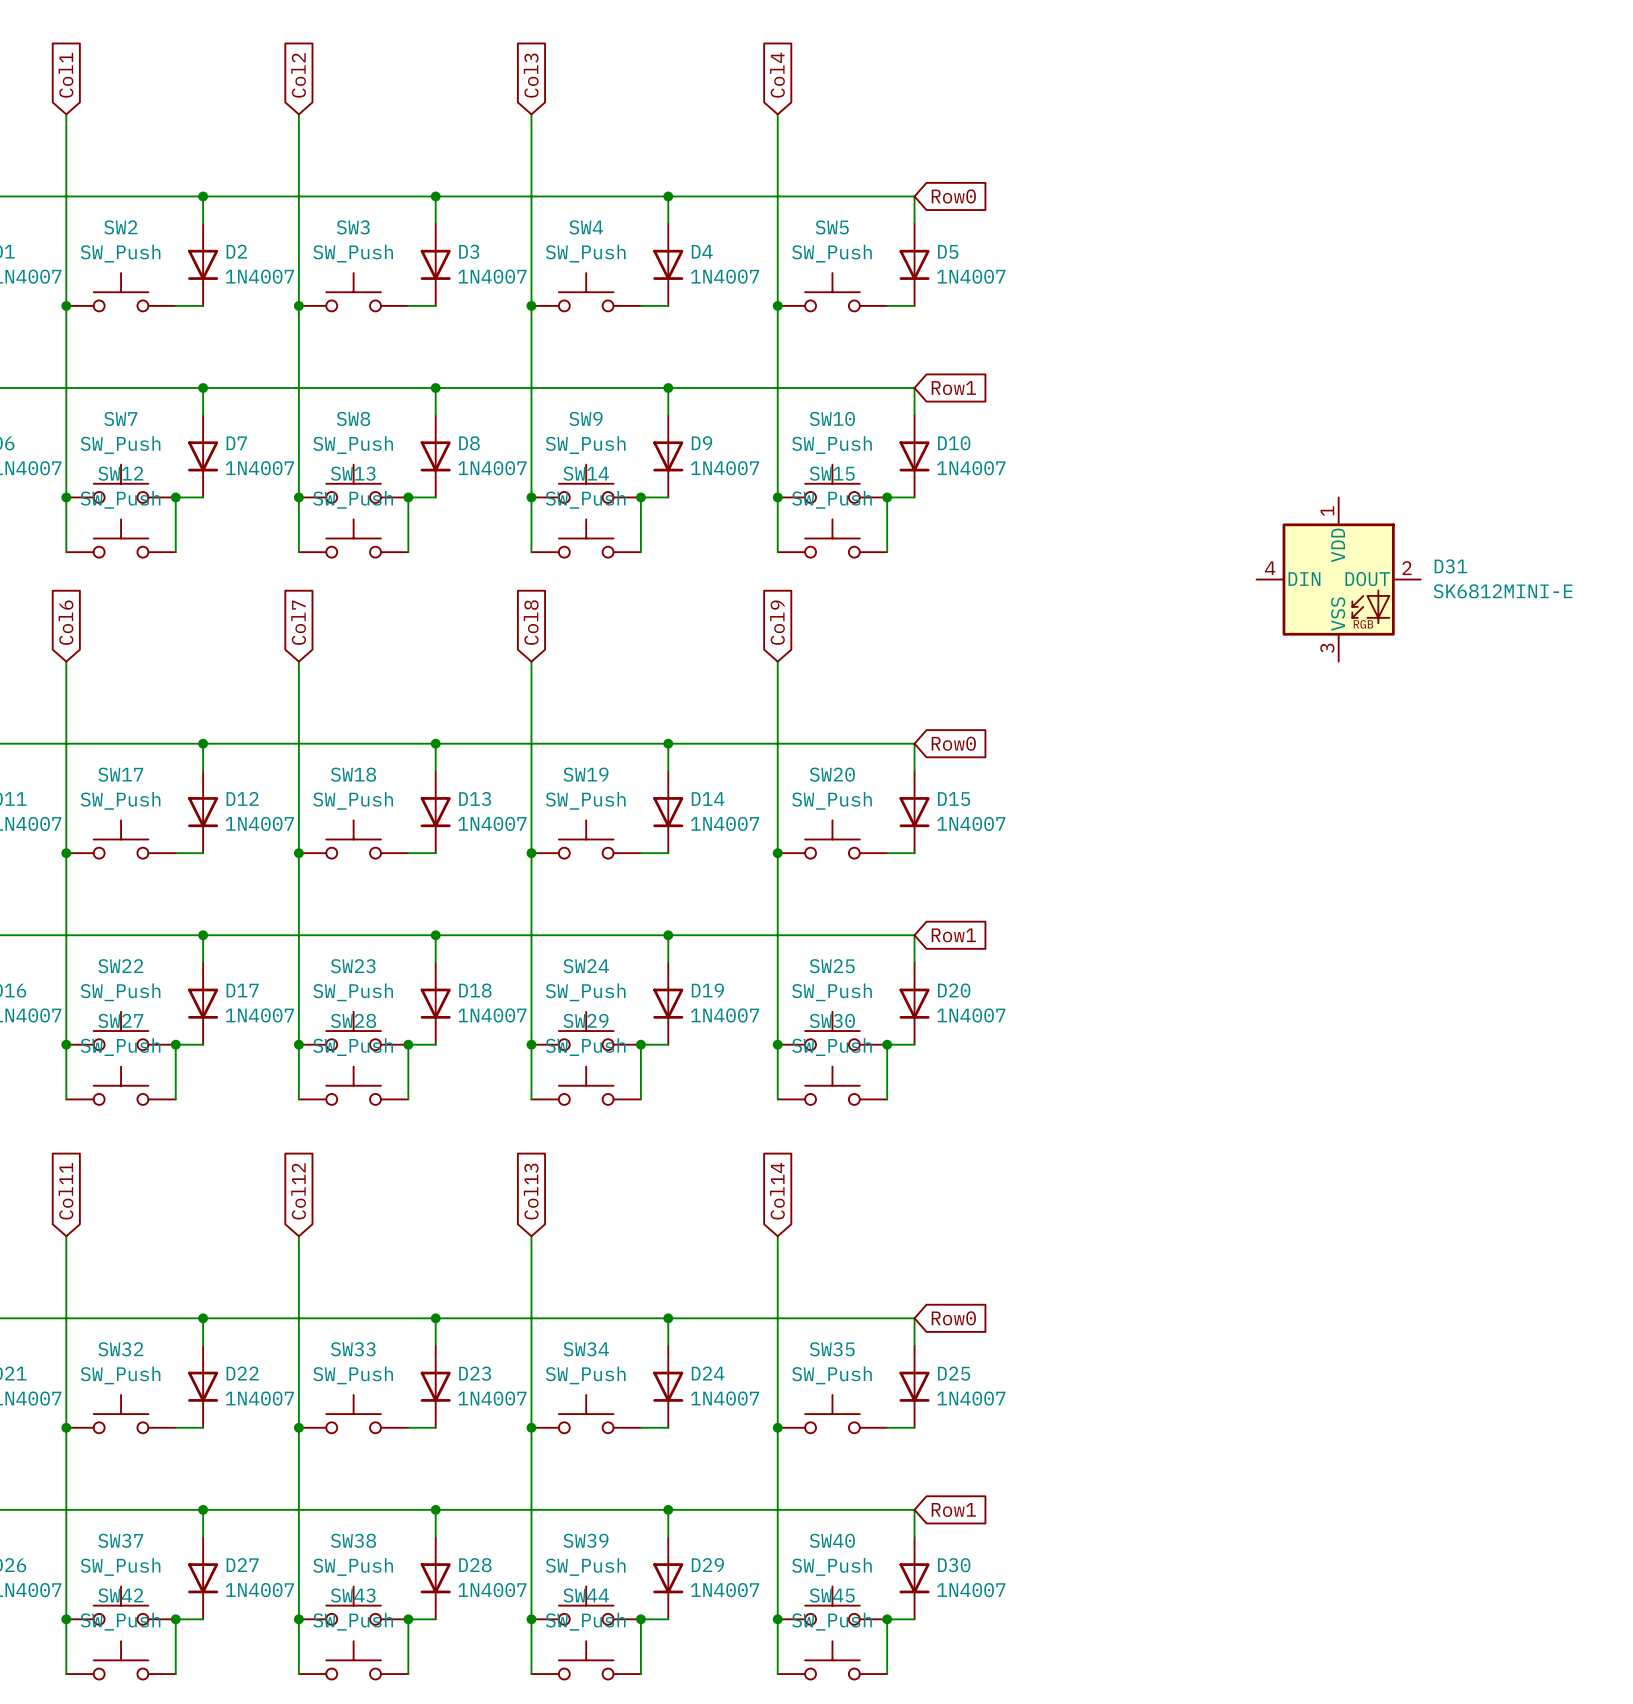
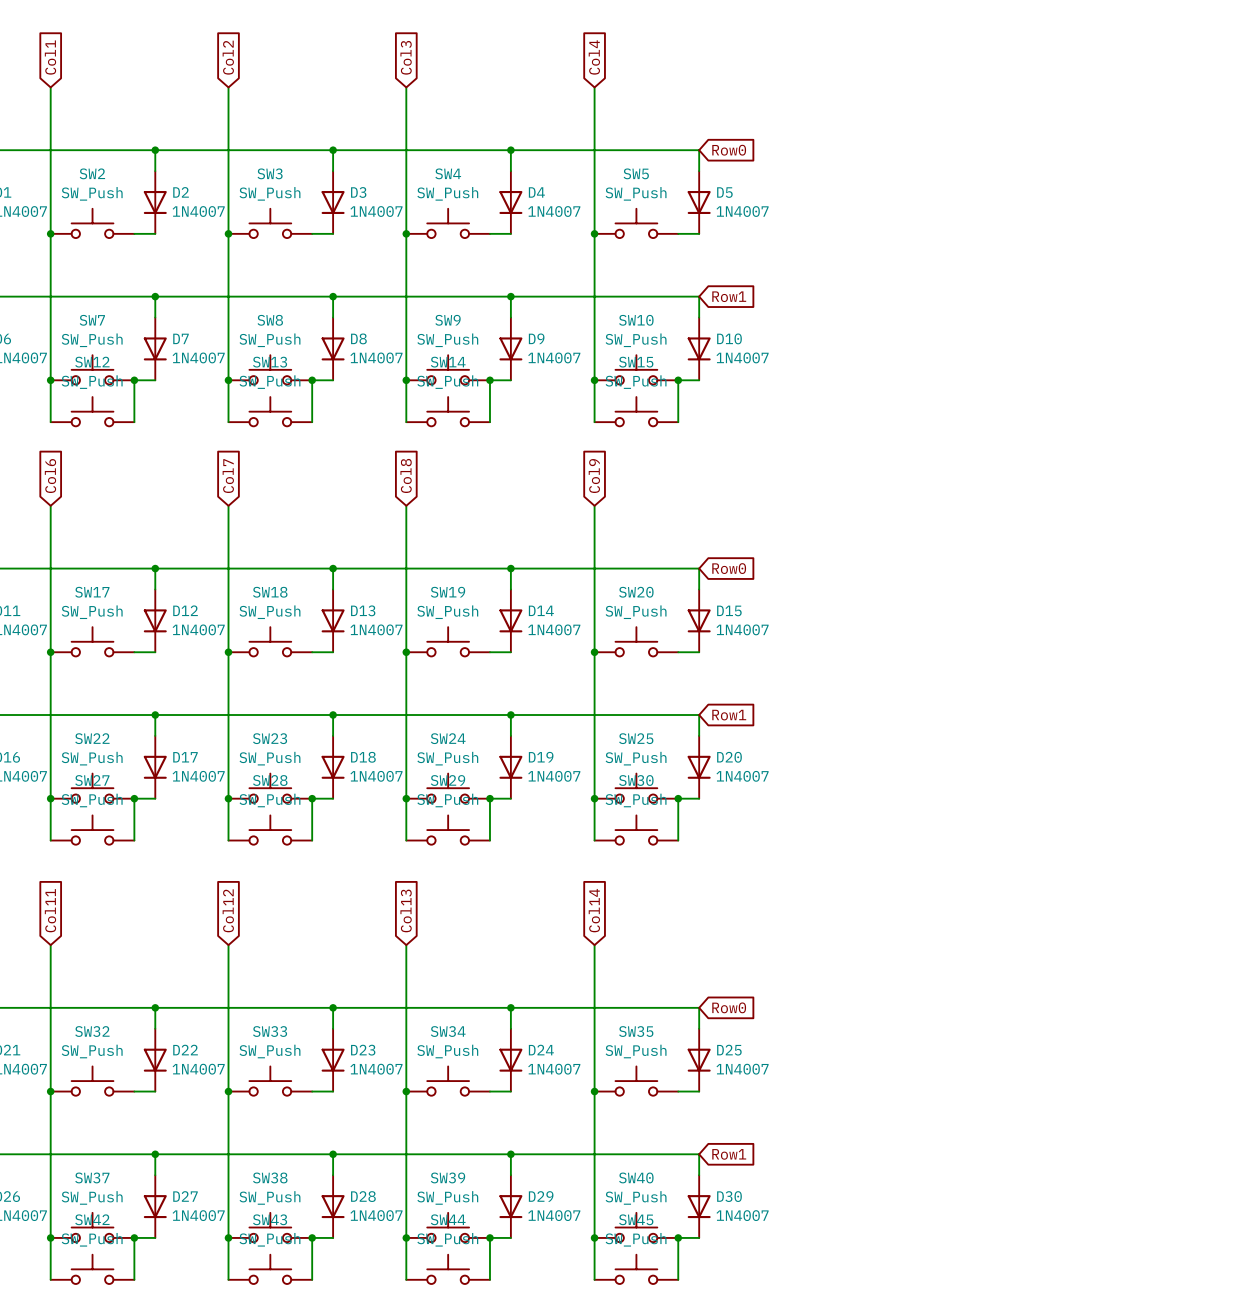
D31: SK6812MINI-E (1338, 579) -> none

